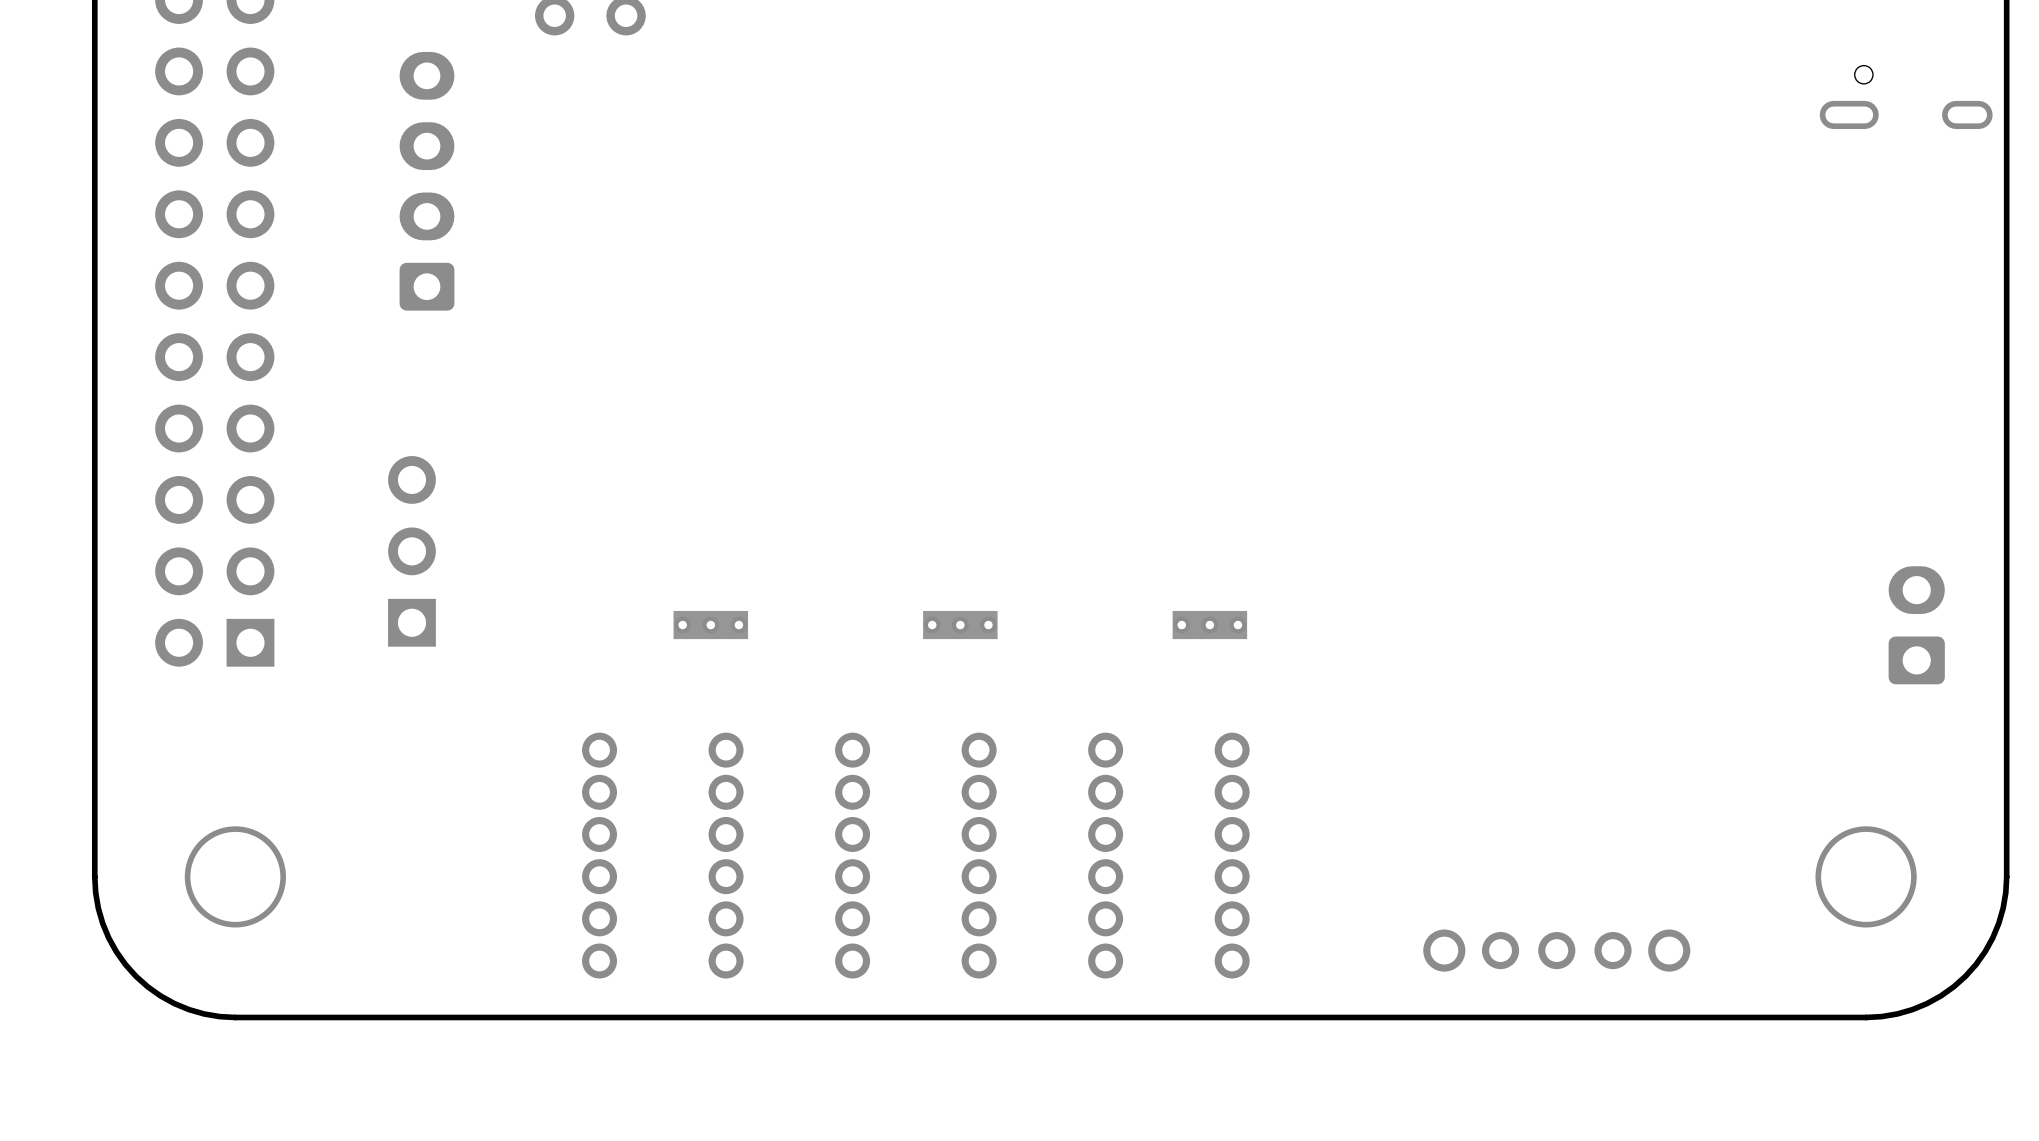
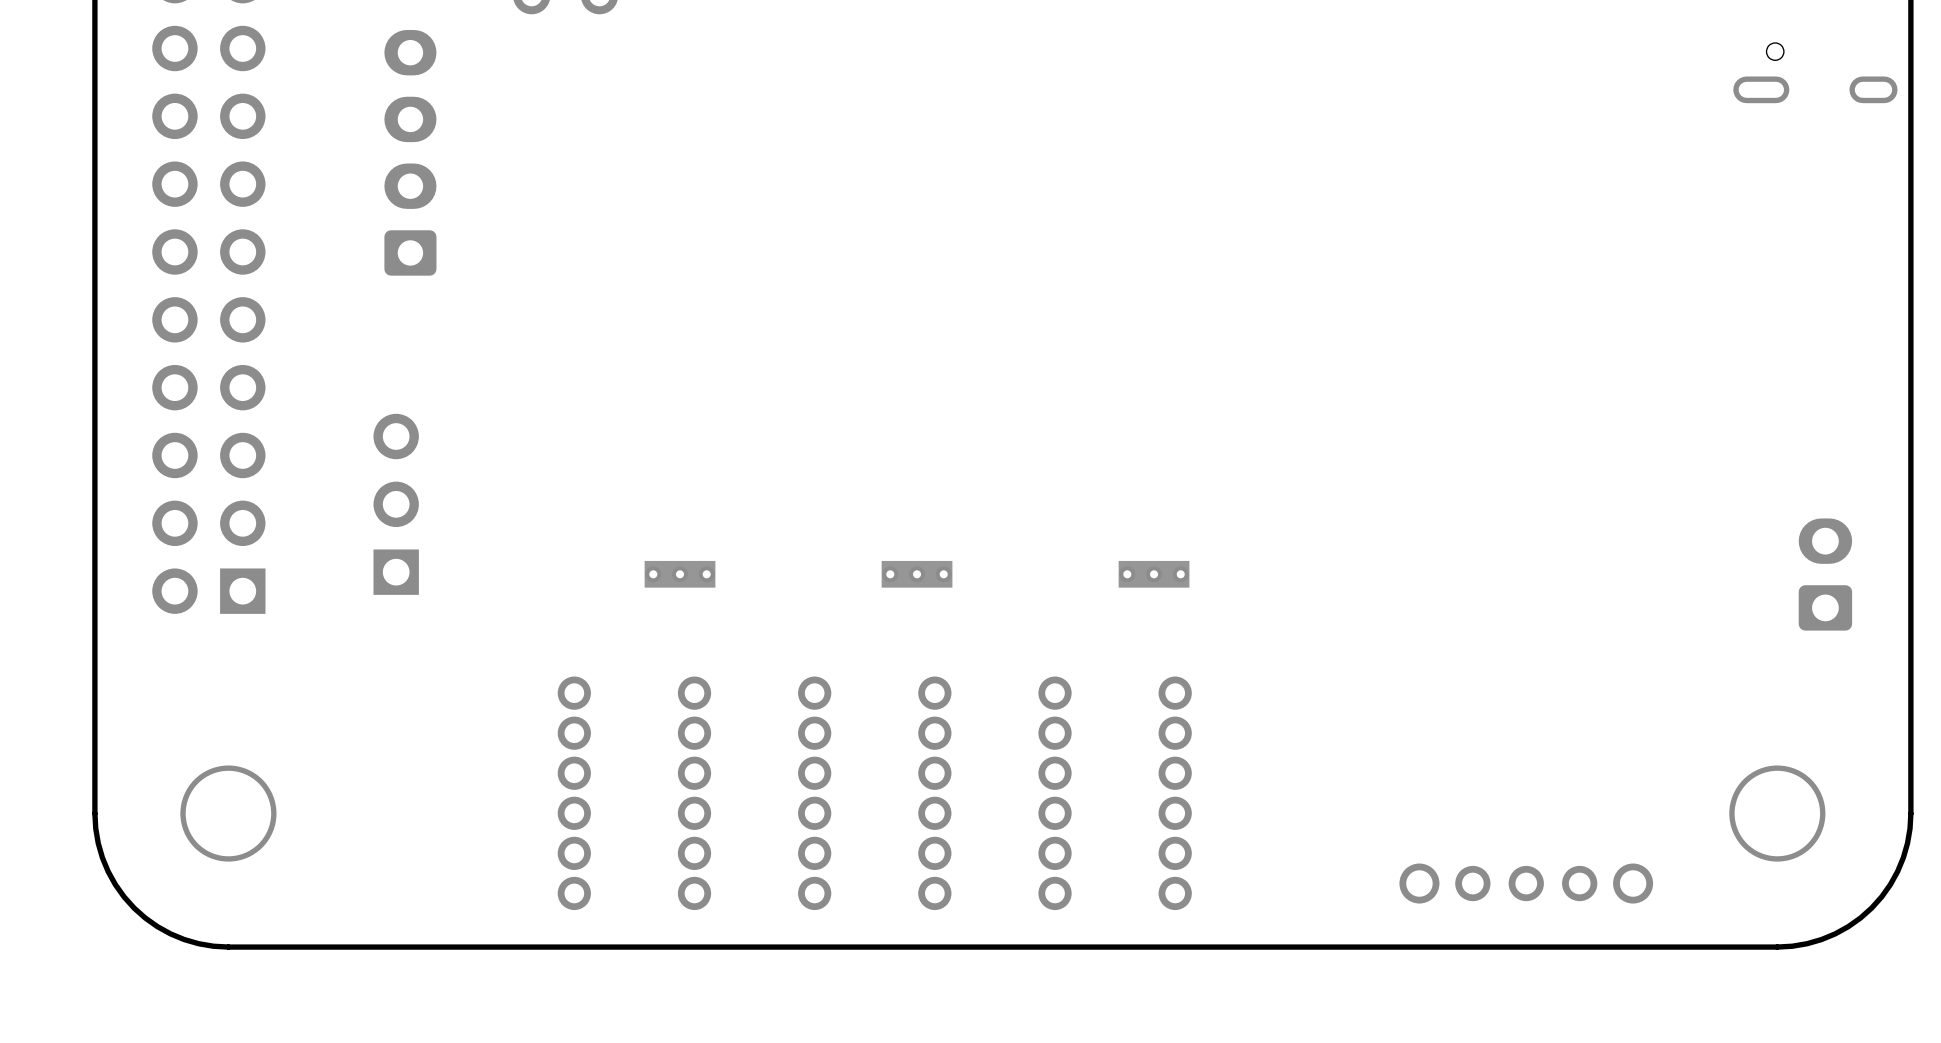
part position: (1556, 950) -> (1526, 883)

